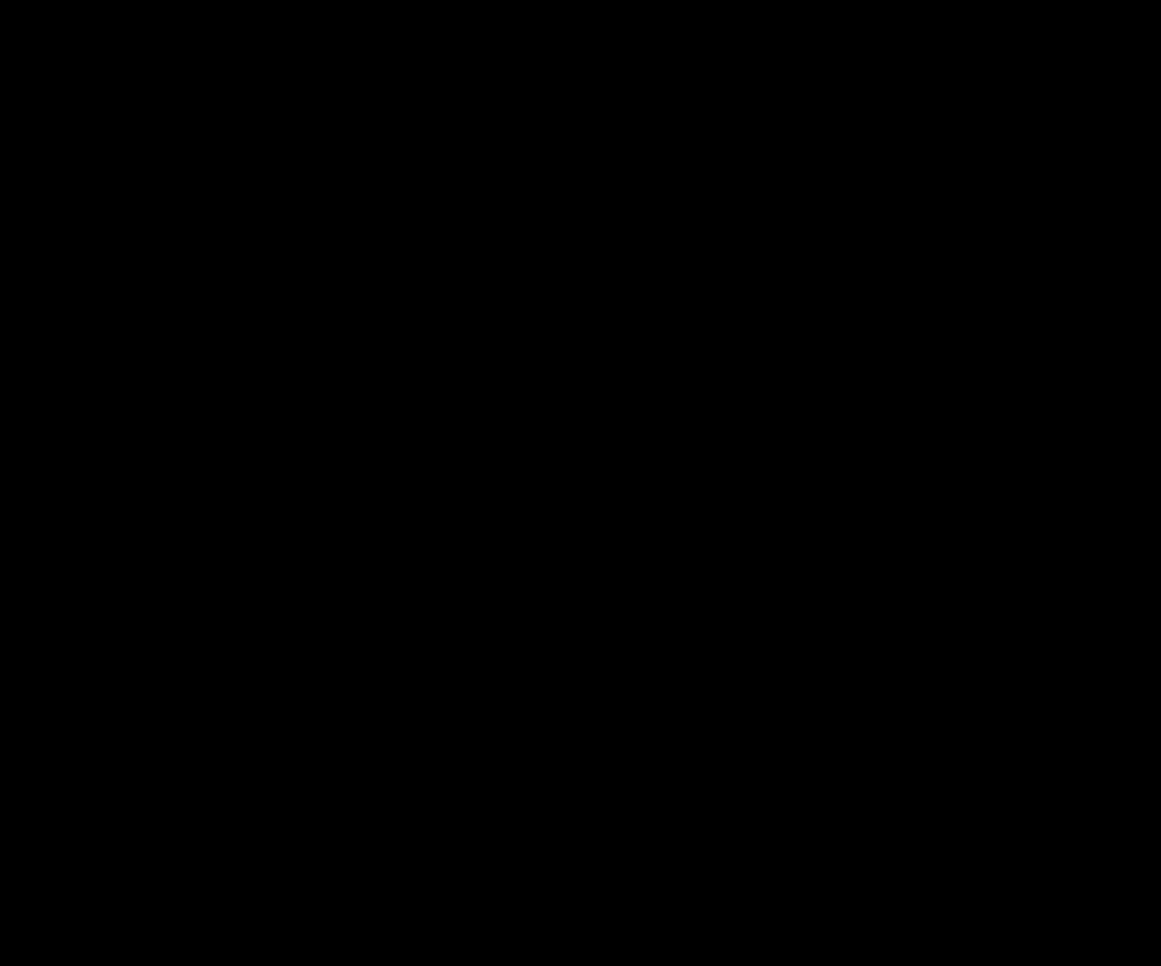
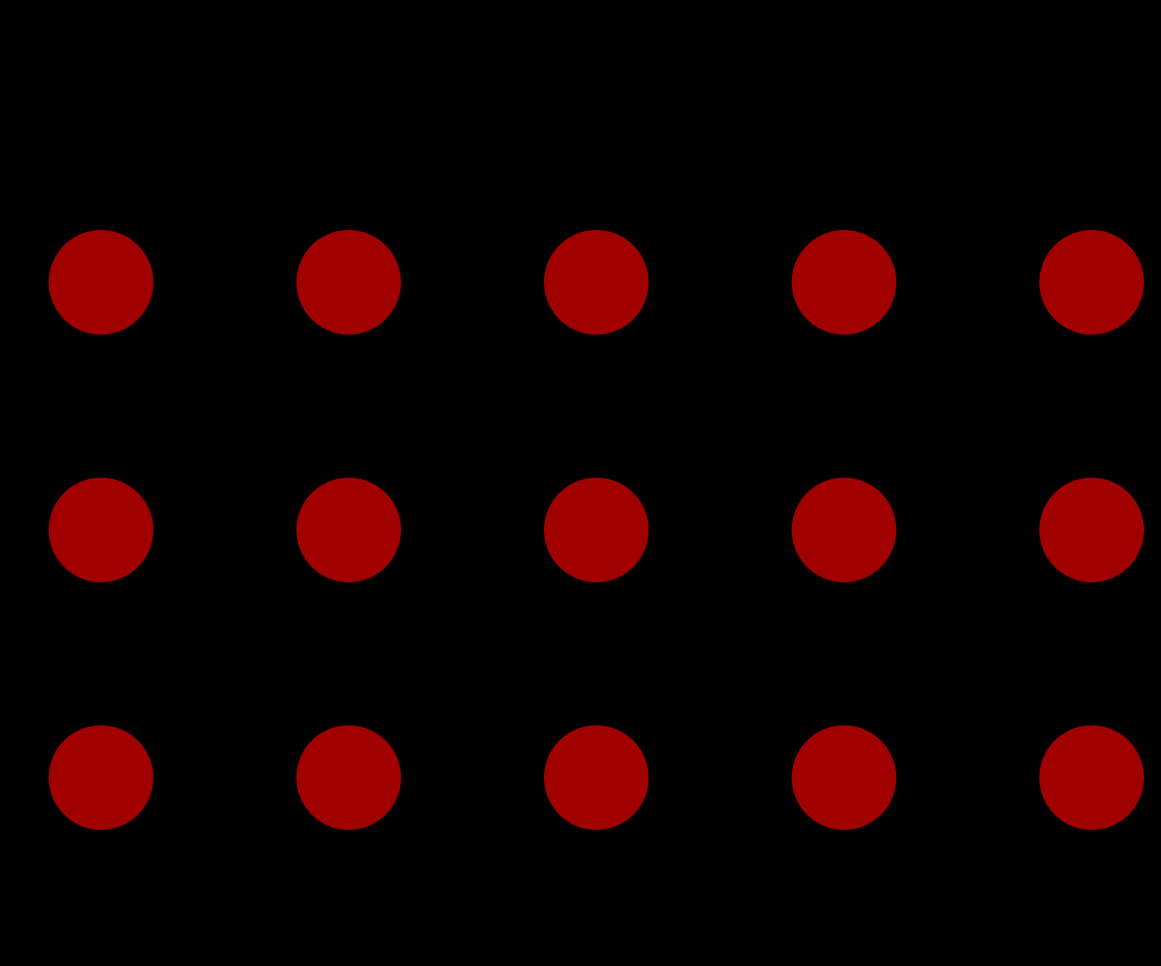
part: none -> (101, 282)
part: none -> (348, 282)
part: none -> (596, 282)
part: none -> (843, 282)
part: none -> (1091, 282)
part: none -> (101, 529)
part: none -> (348, 529)
part: none -> (596, 529)
part: none -> (843, 529)
part: none -> (1091, 529)
part: none -> (101, 777)
part: none -> (348, 777)
part: none -> (596, 777)
part: none -> (843, 777)
part: none -> (1091, 777)

